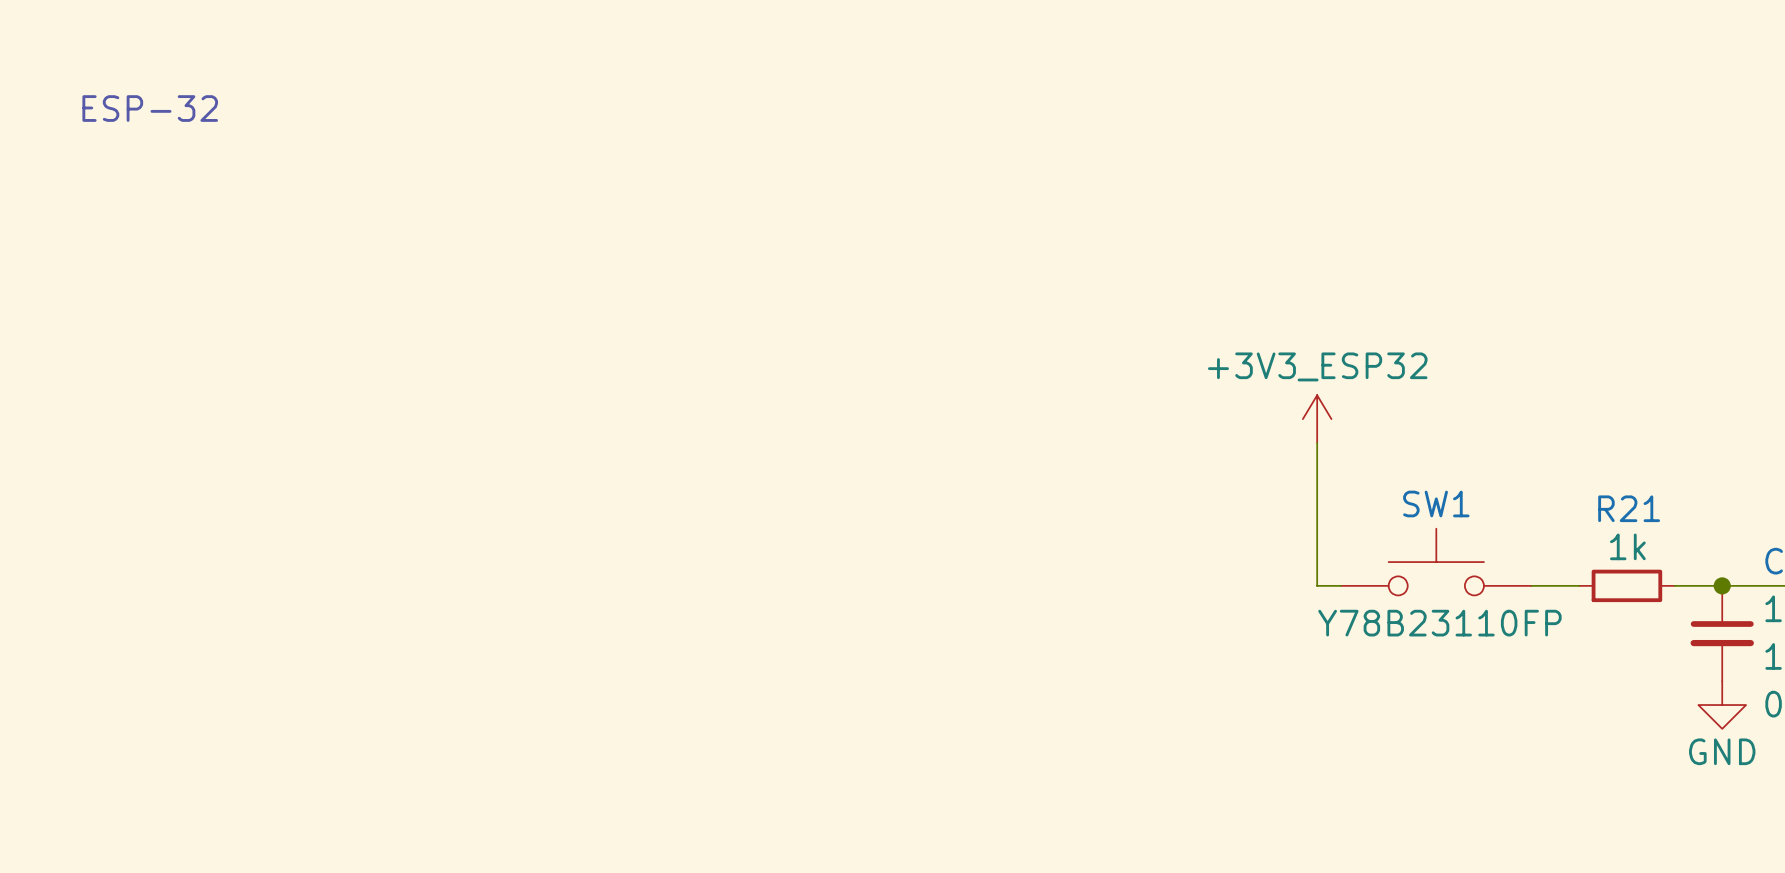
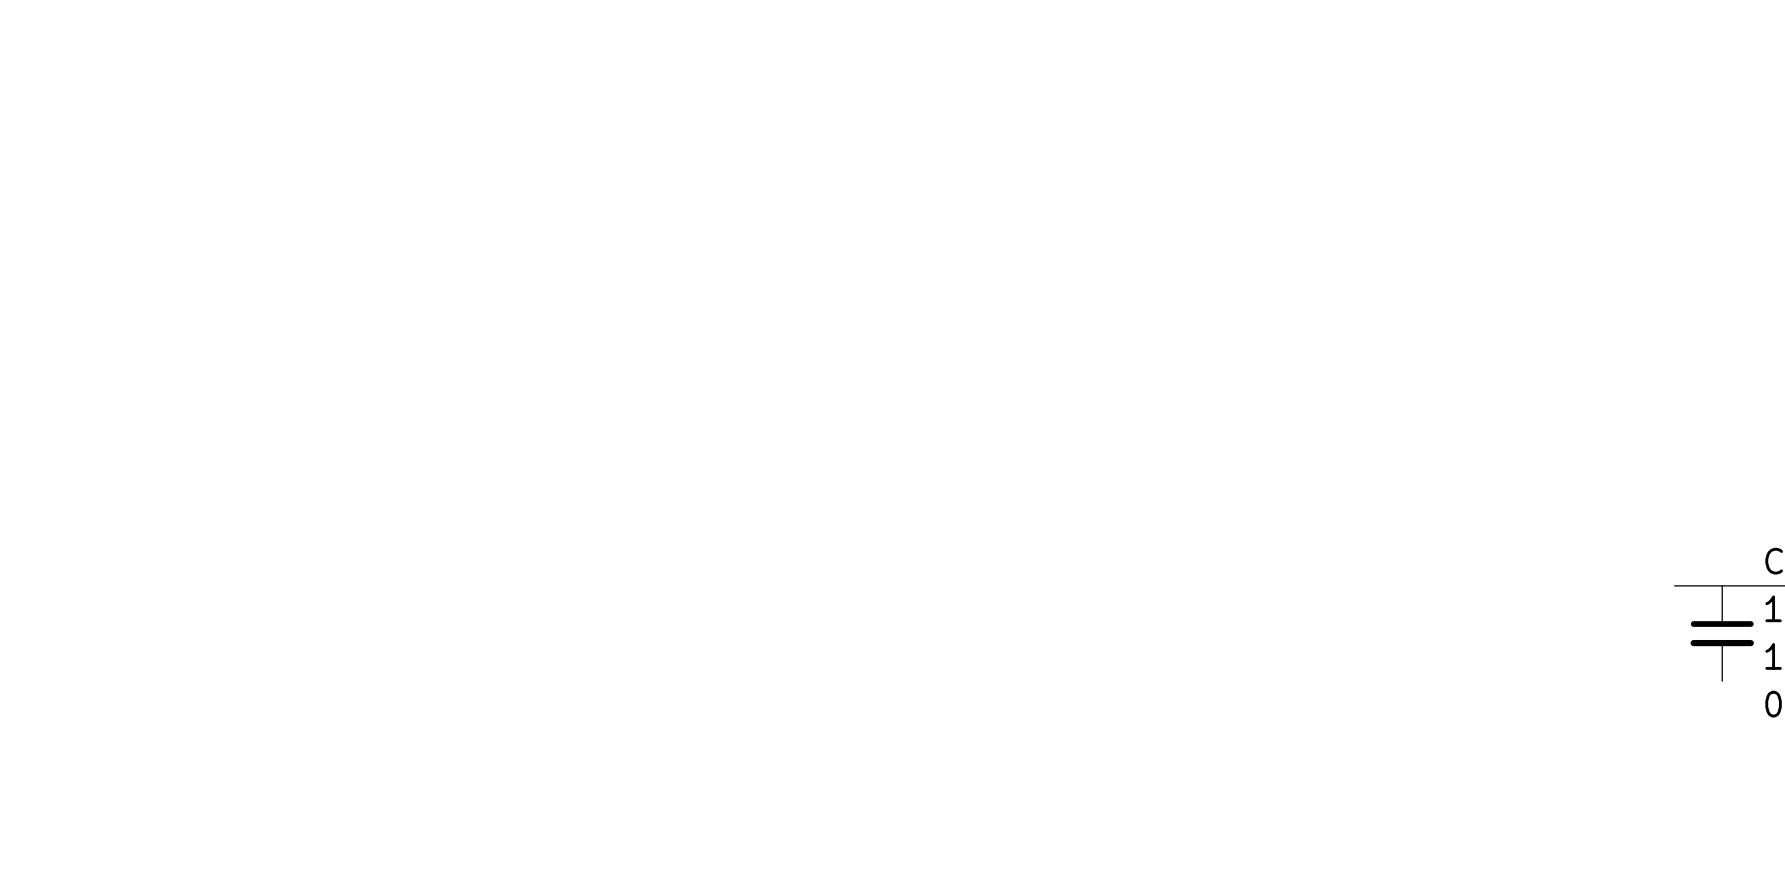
text: ESP-32 (150, 108) -> none
power symbol: +3V3_ESP32 (1317, 419) -> none
wire: (1317, 442) (1317, 585) (1341, 585) -> none
SW1: (1436, 562) -> none
wire: (1531, 585) (1579, 585) -> none
R21: 1k (1626, 585) -> none
junction: (1722, 585) -> none
power symbol: GND (1722, 705) -> none

